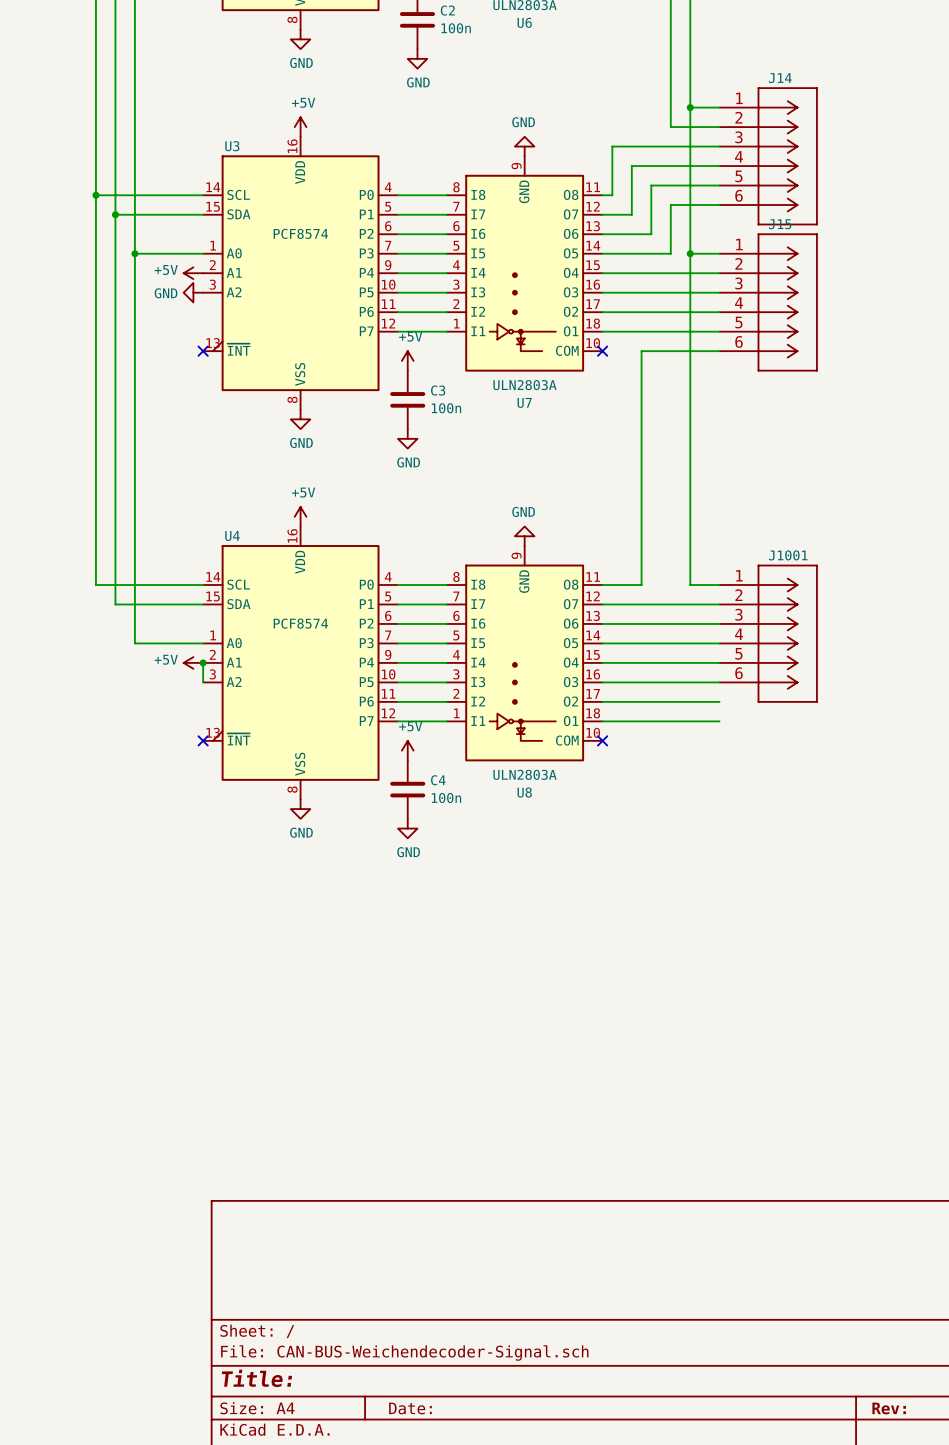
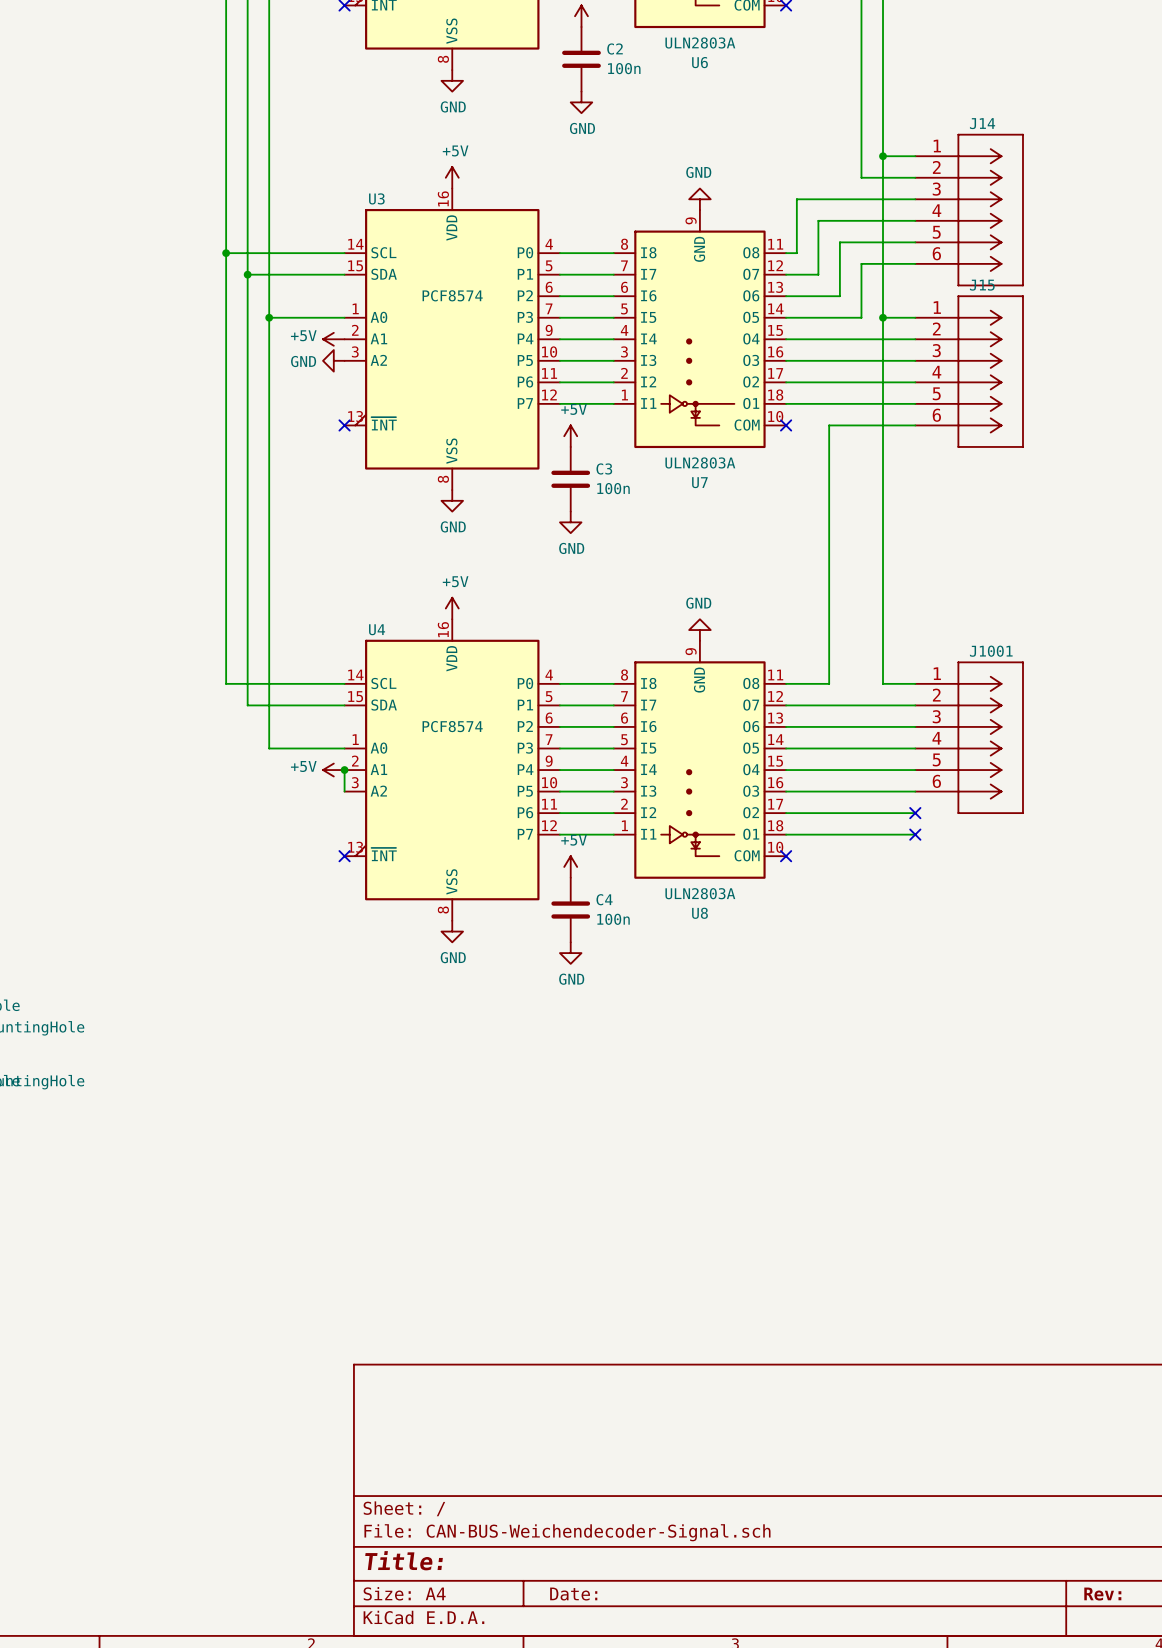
no-connect mark: none -> (915, 813)
no-connect mark: none -> (915, 834)

